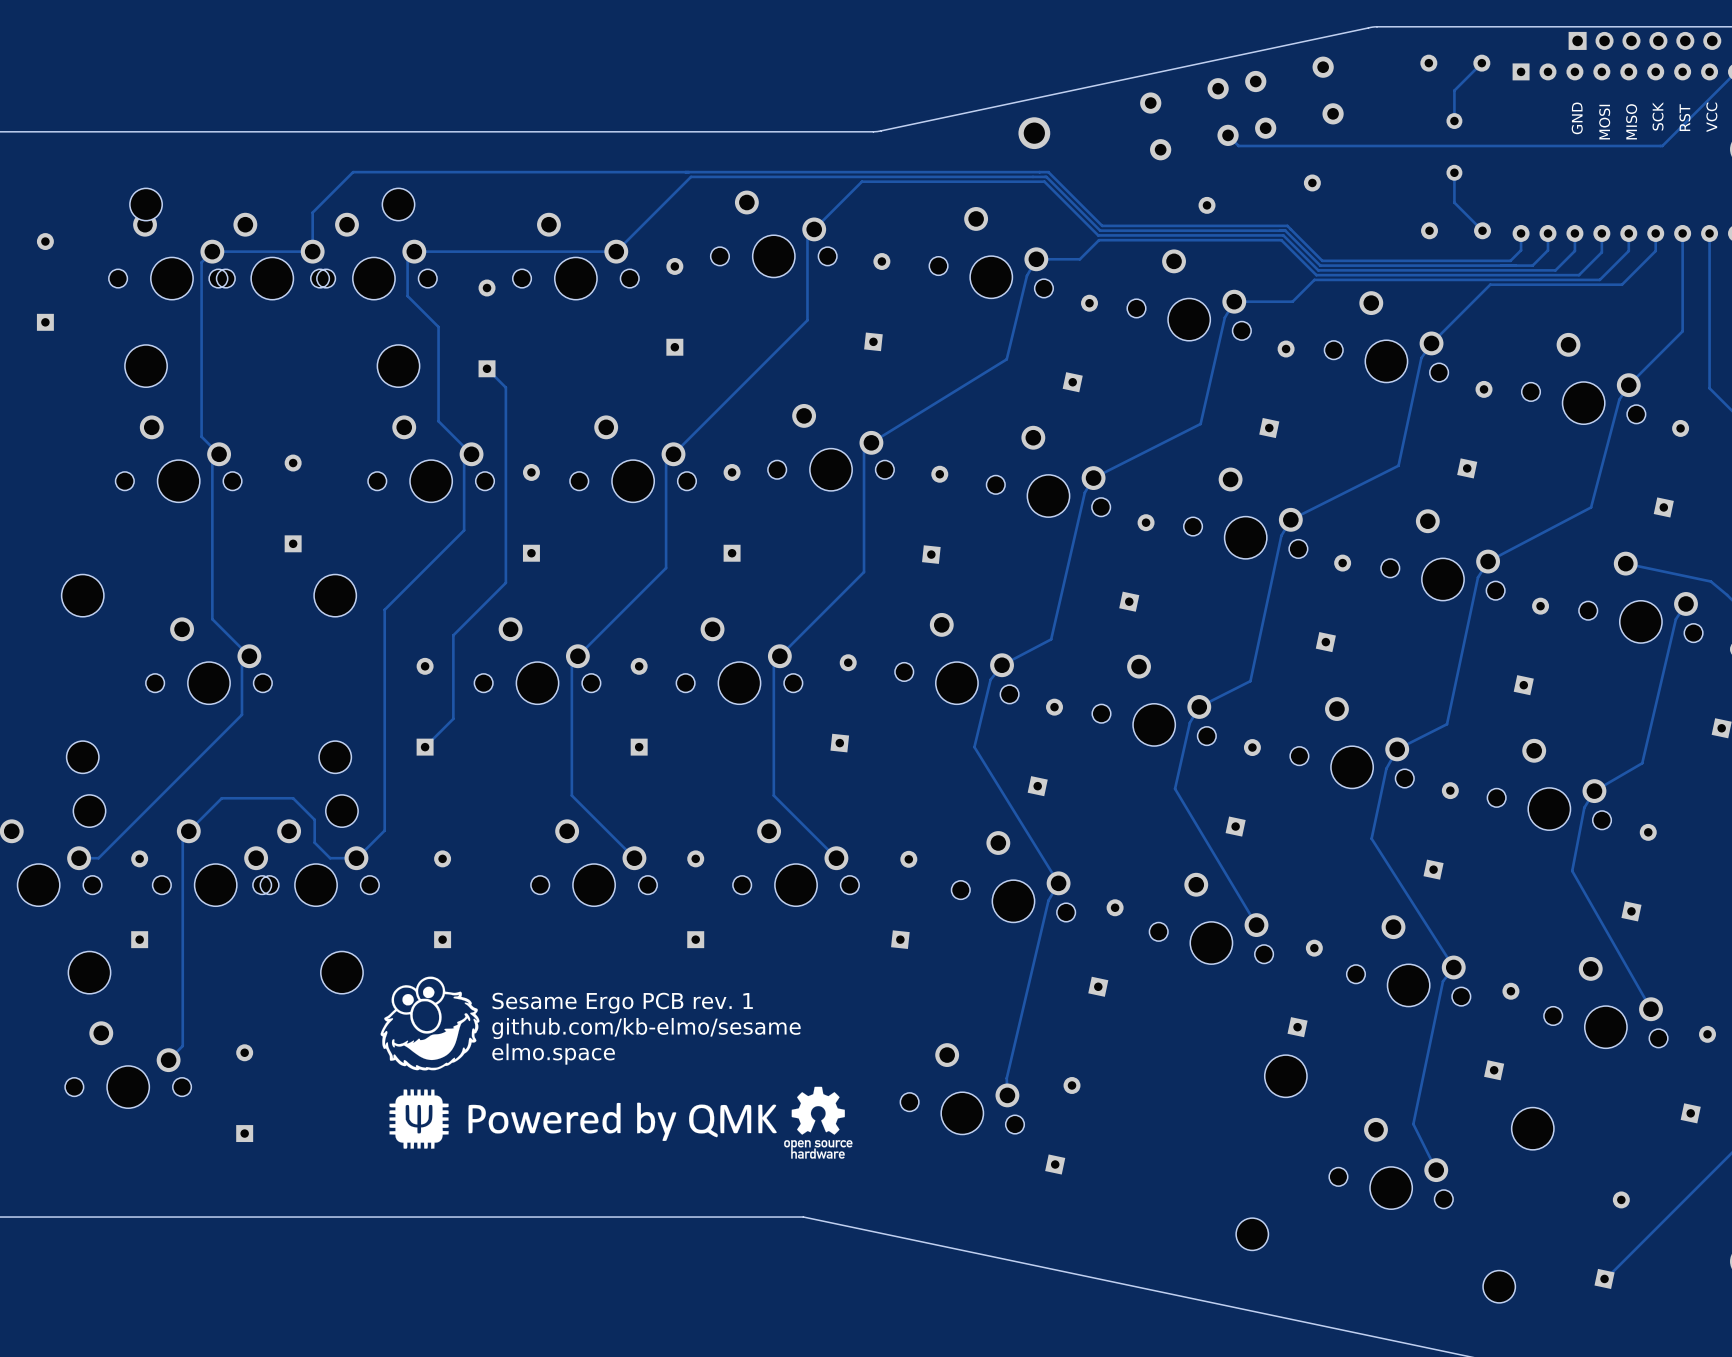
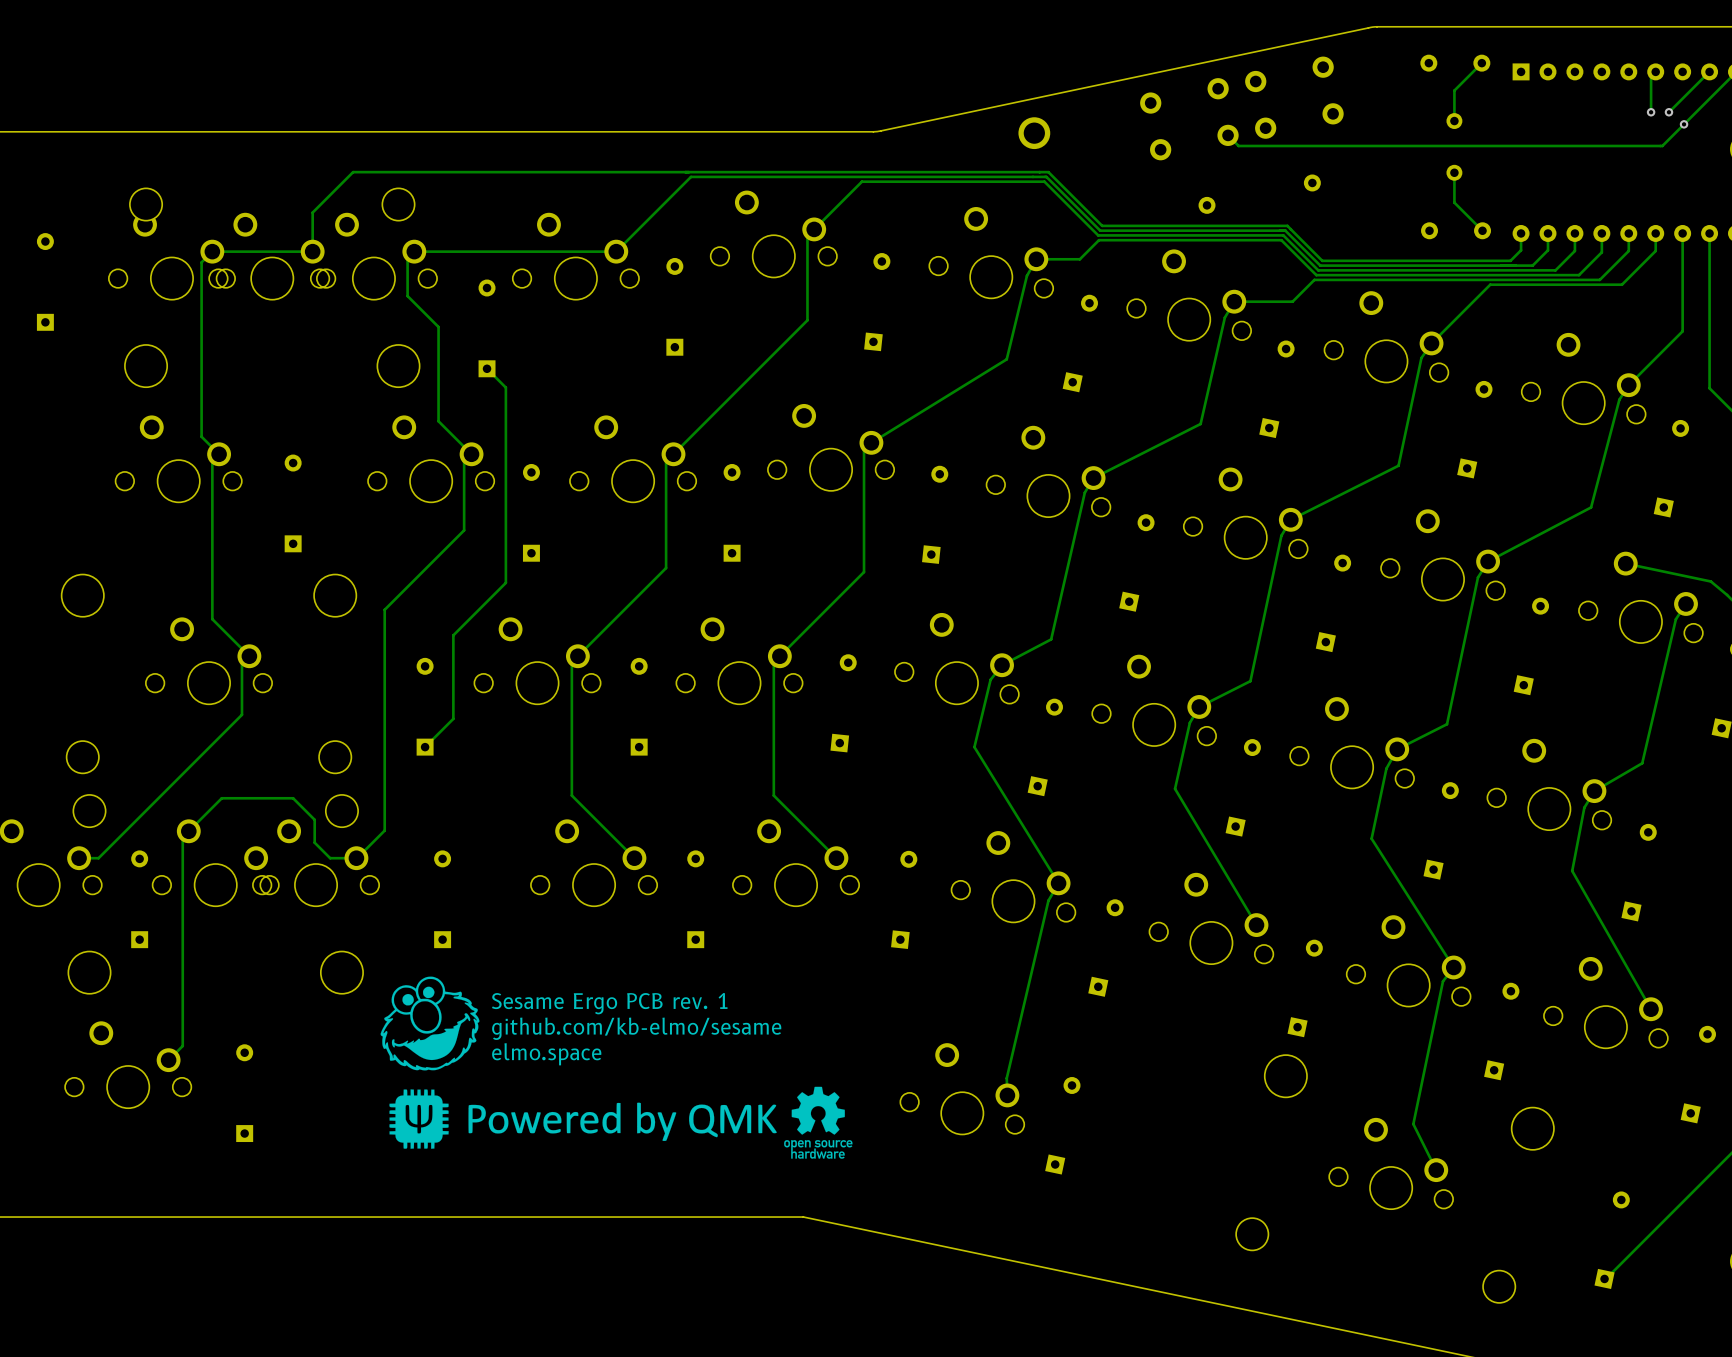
part: (1644, 40) -> none
track: none -> (1655, 71) (1651, 76) (1651, 112)
track: none -> (1709, 71) (1668, 112)
via: none -> (1651, 112)
via: none -> (1668, 112)
text: SCK (1658, 116) -> none
text: RST (1684, 117) -> none
text: VCC (1711, 117) -> none
text: GND (1577, 118) -> none
text: MISO (1631, 121) -> none
text: MOSI (1604, 122) -> none
via: none -> (1684, 124)

